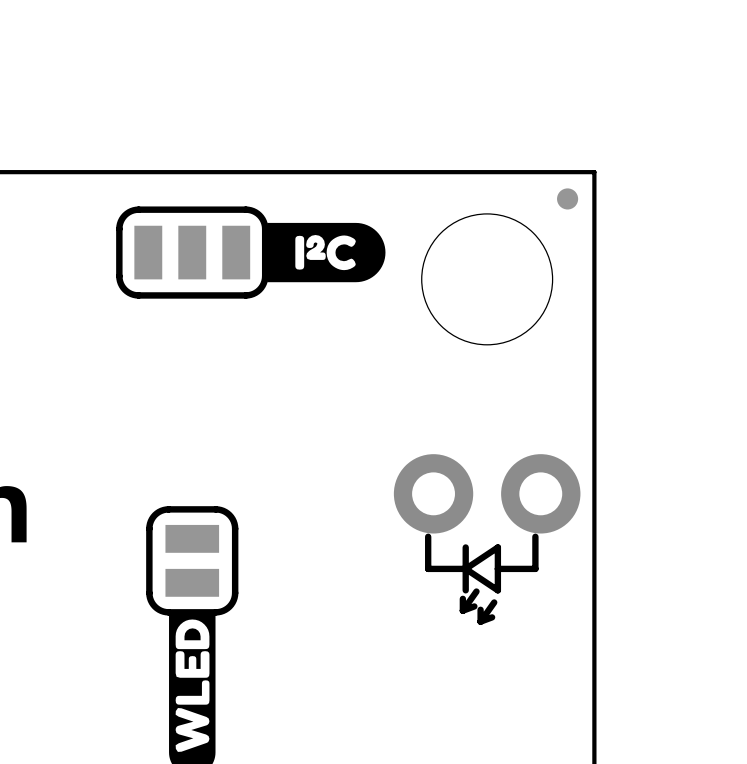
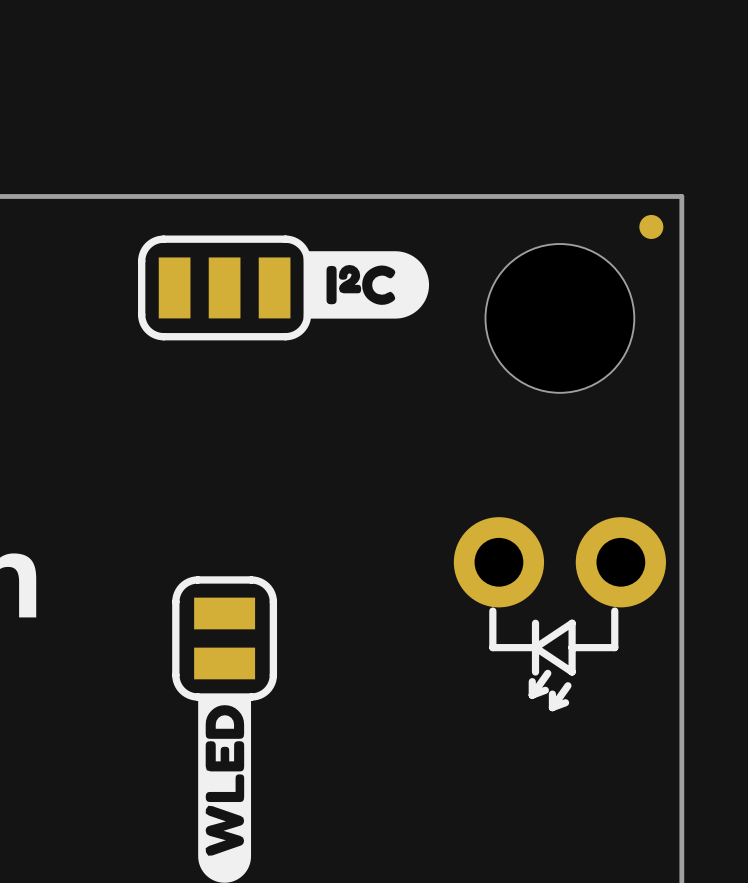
drawing shape: [267, 222, 386, 283] -> [303, 251, 430, 319]

